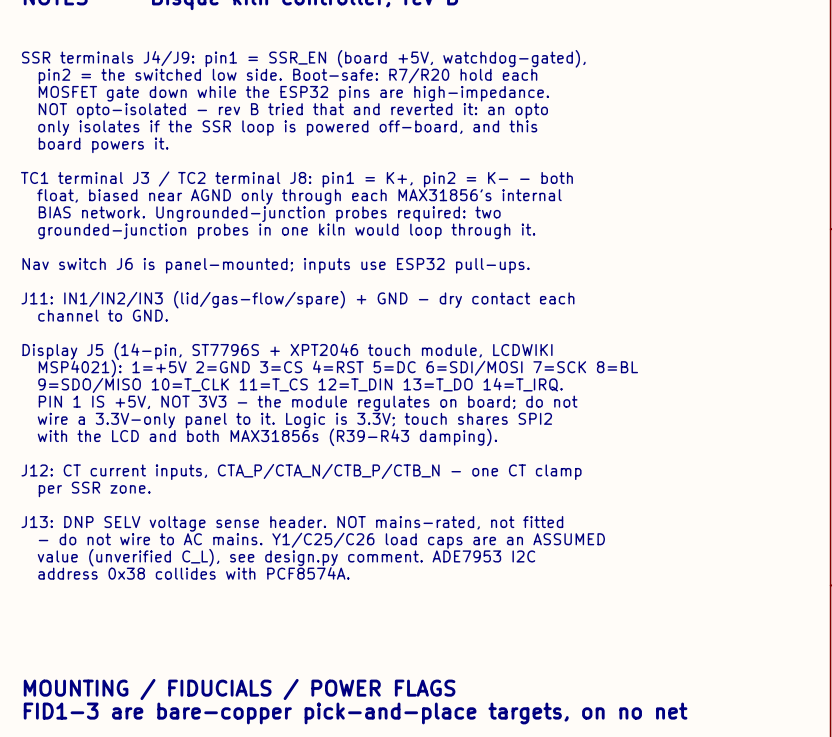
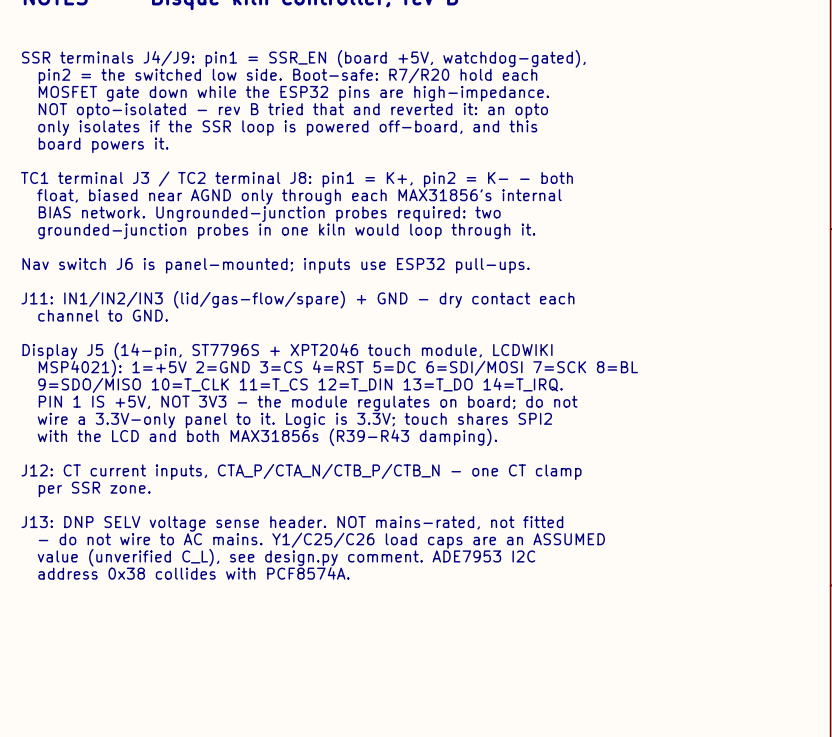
text: MOUNTING / FIDUCIALS / POWER FLAGS (239, 689) -> none
text: FID1-3 are bare-copper pick-and-place targets, on no net (355, 713) -> none

